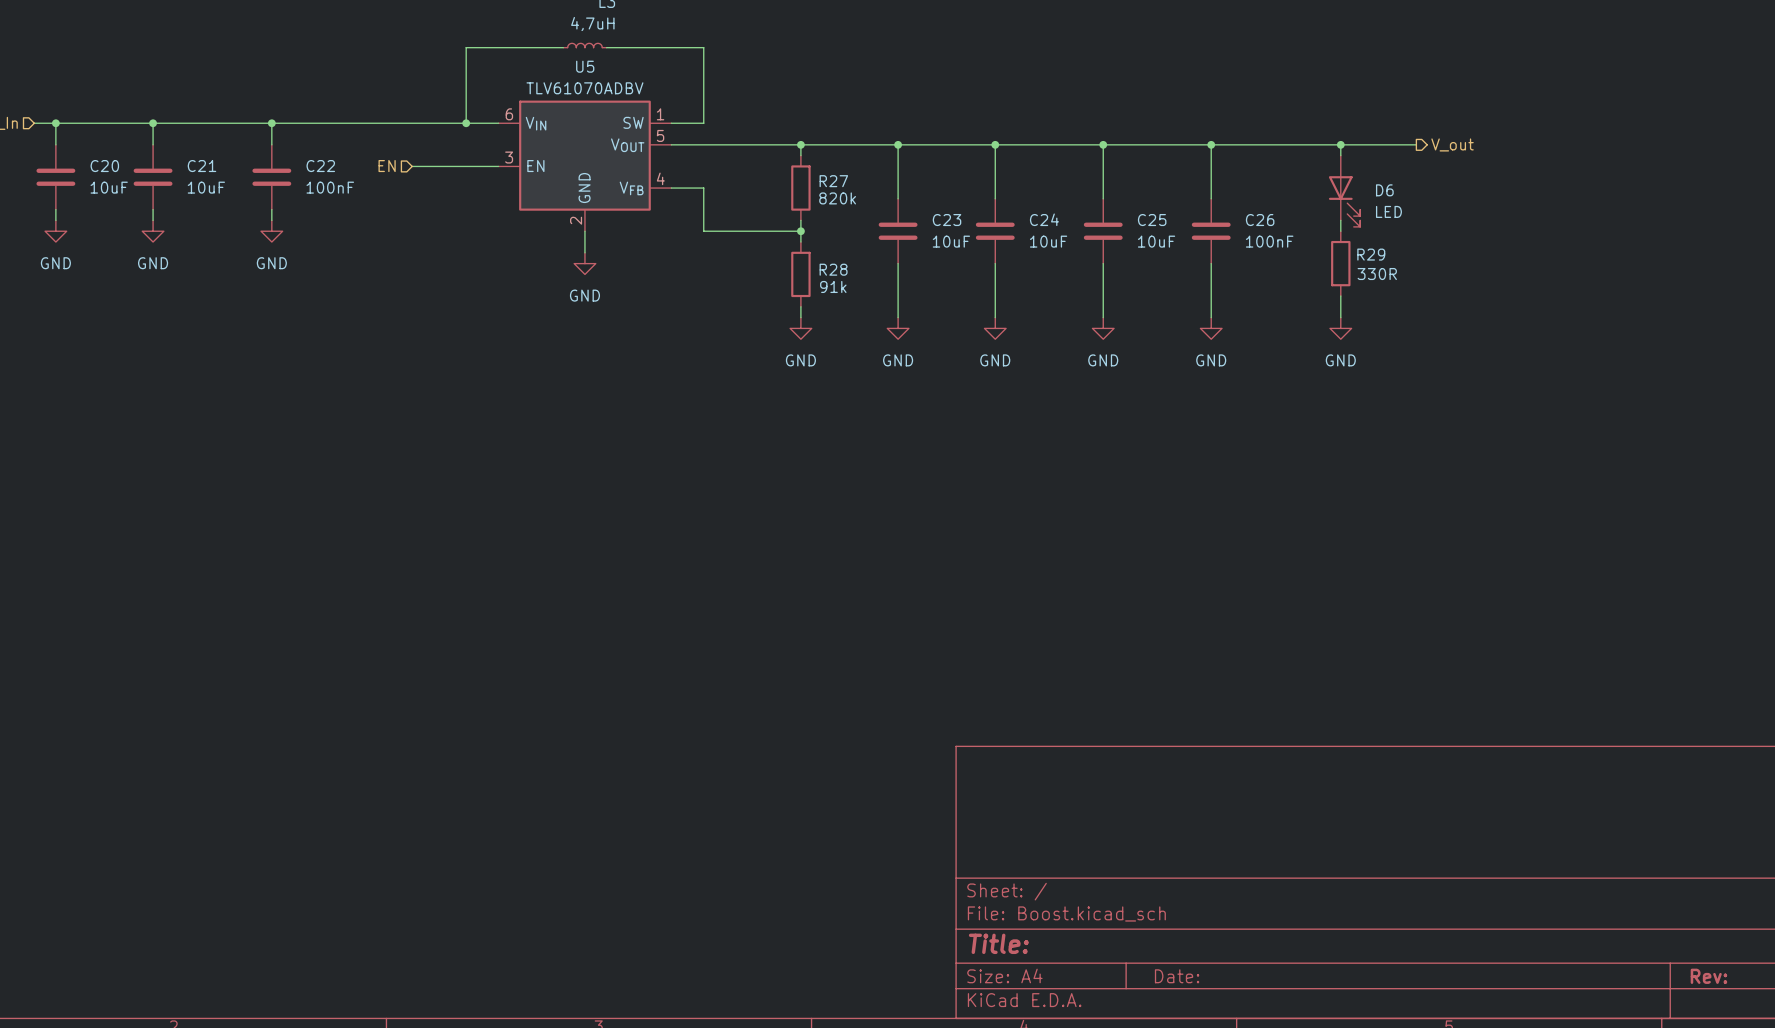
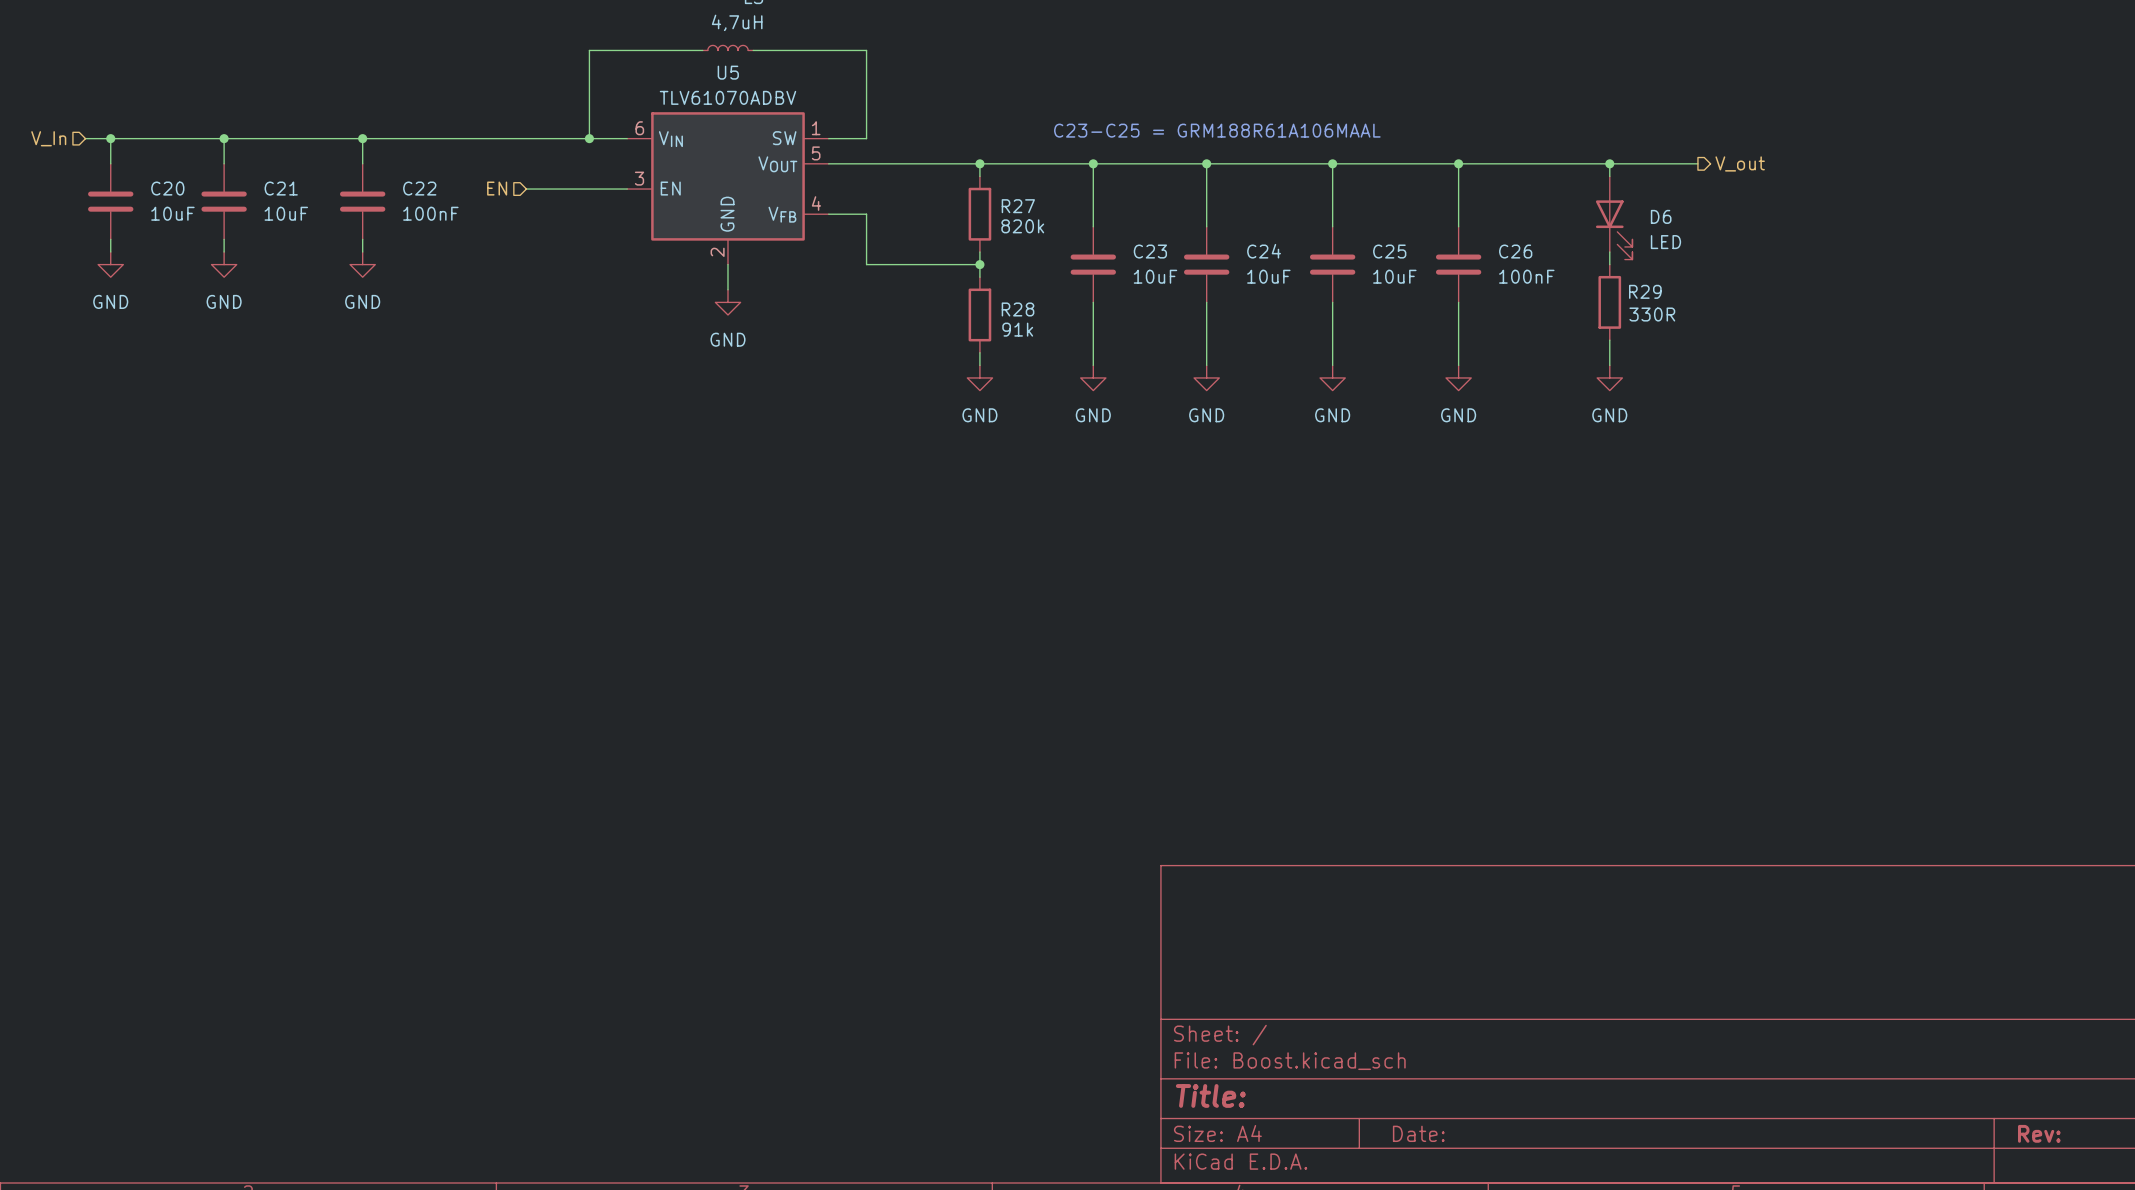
text: none -> C23-C25 = GRM188R61A106MAAL (1217, 130)

